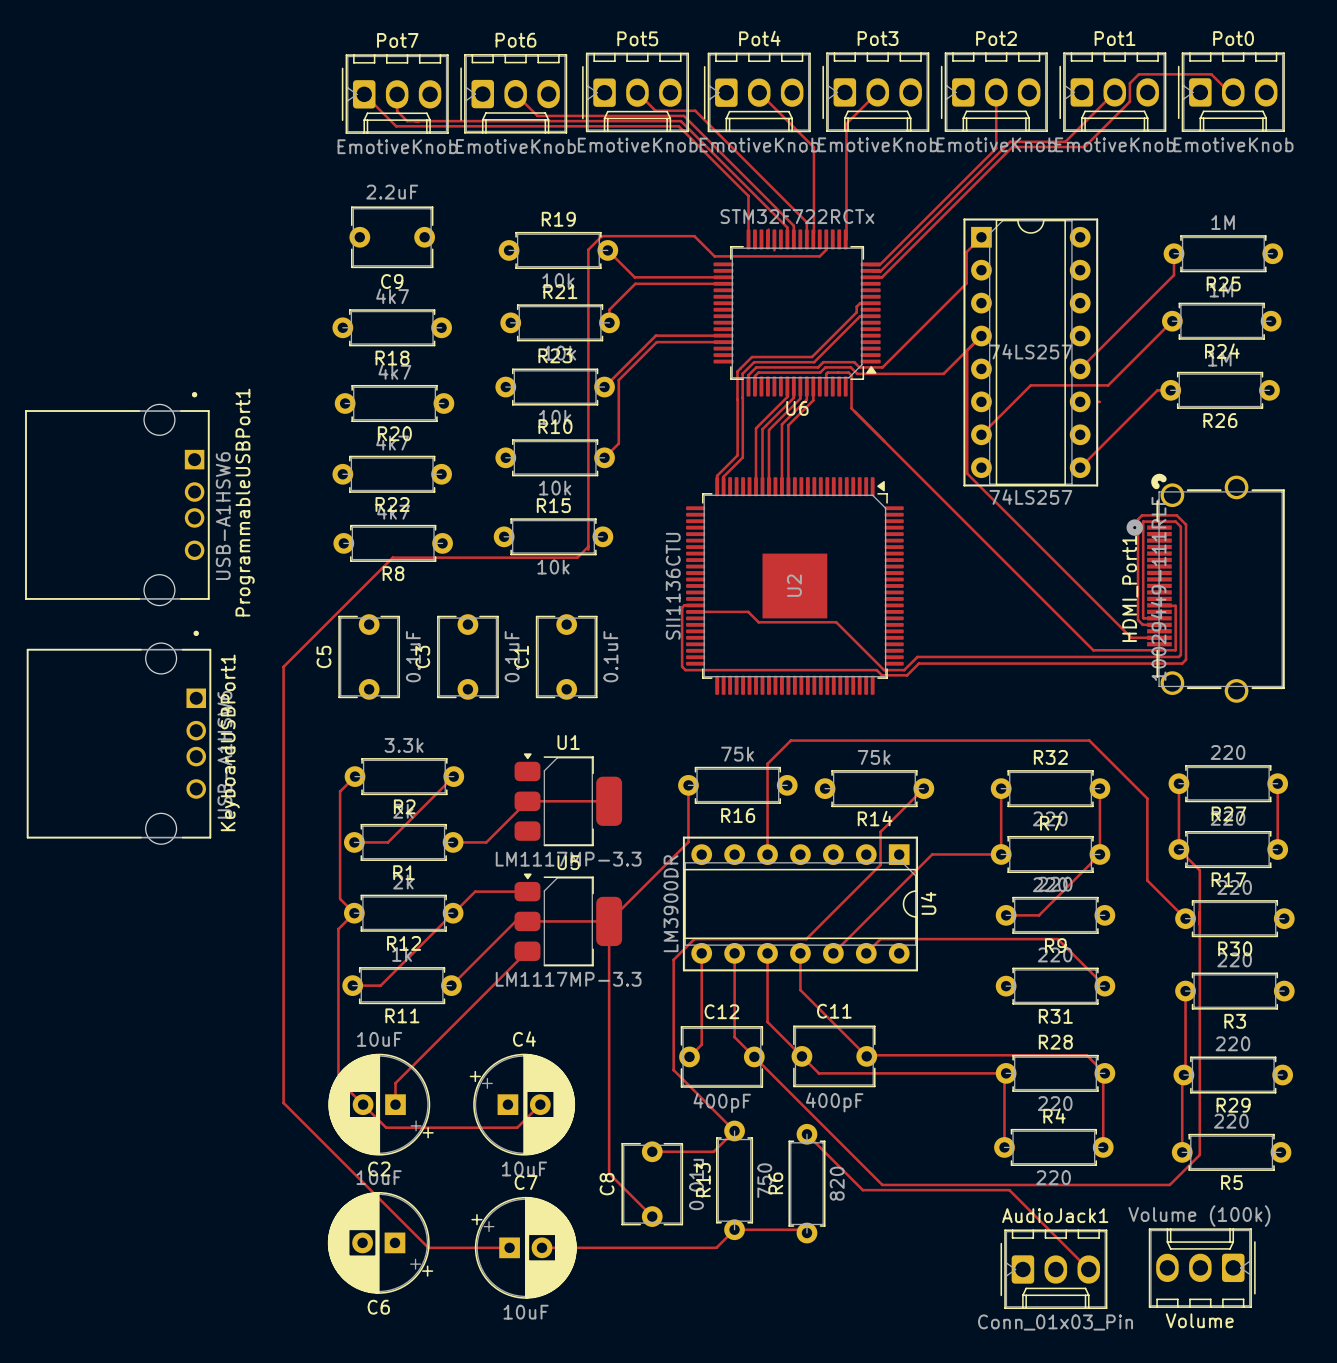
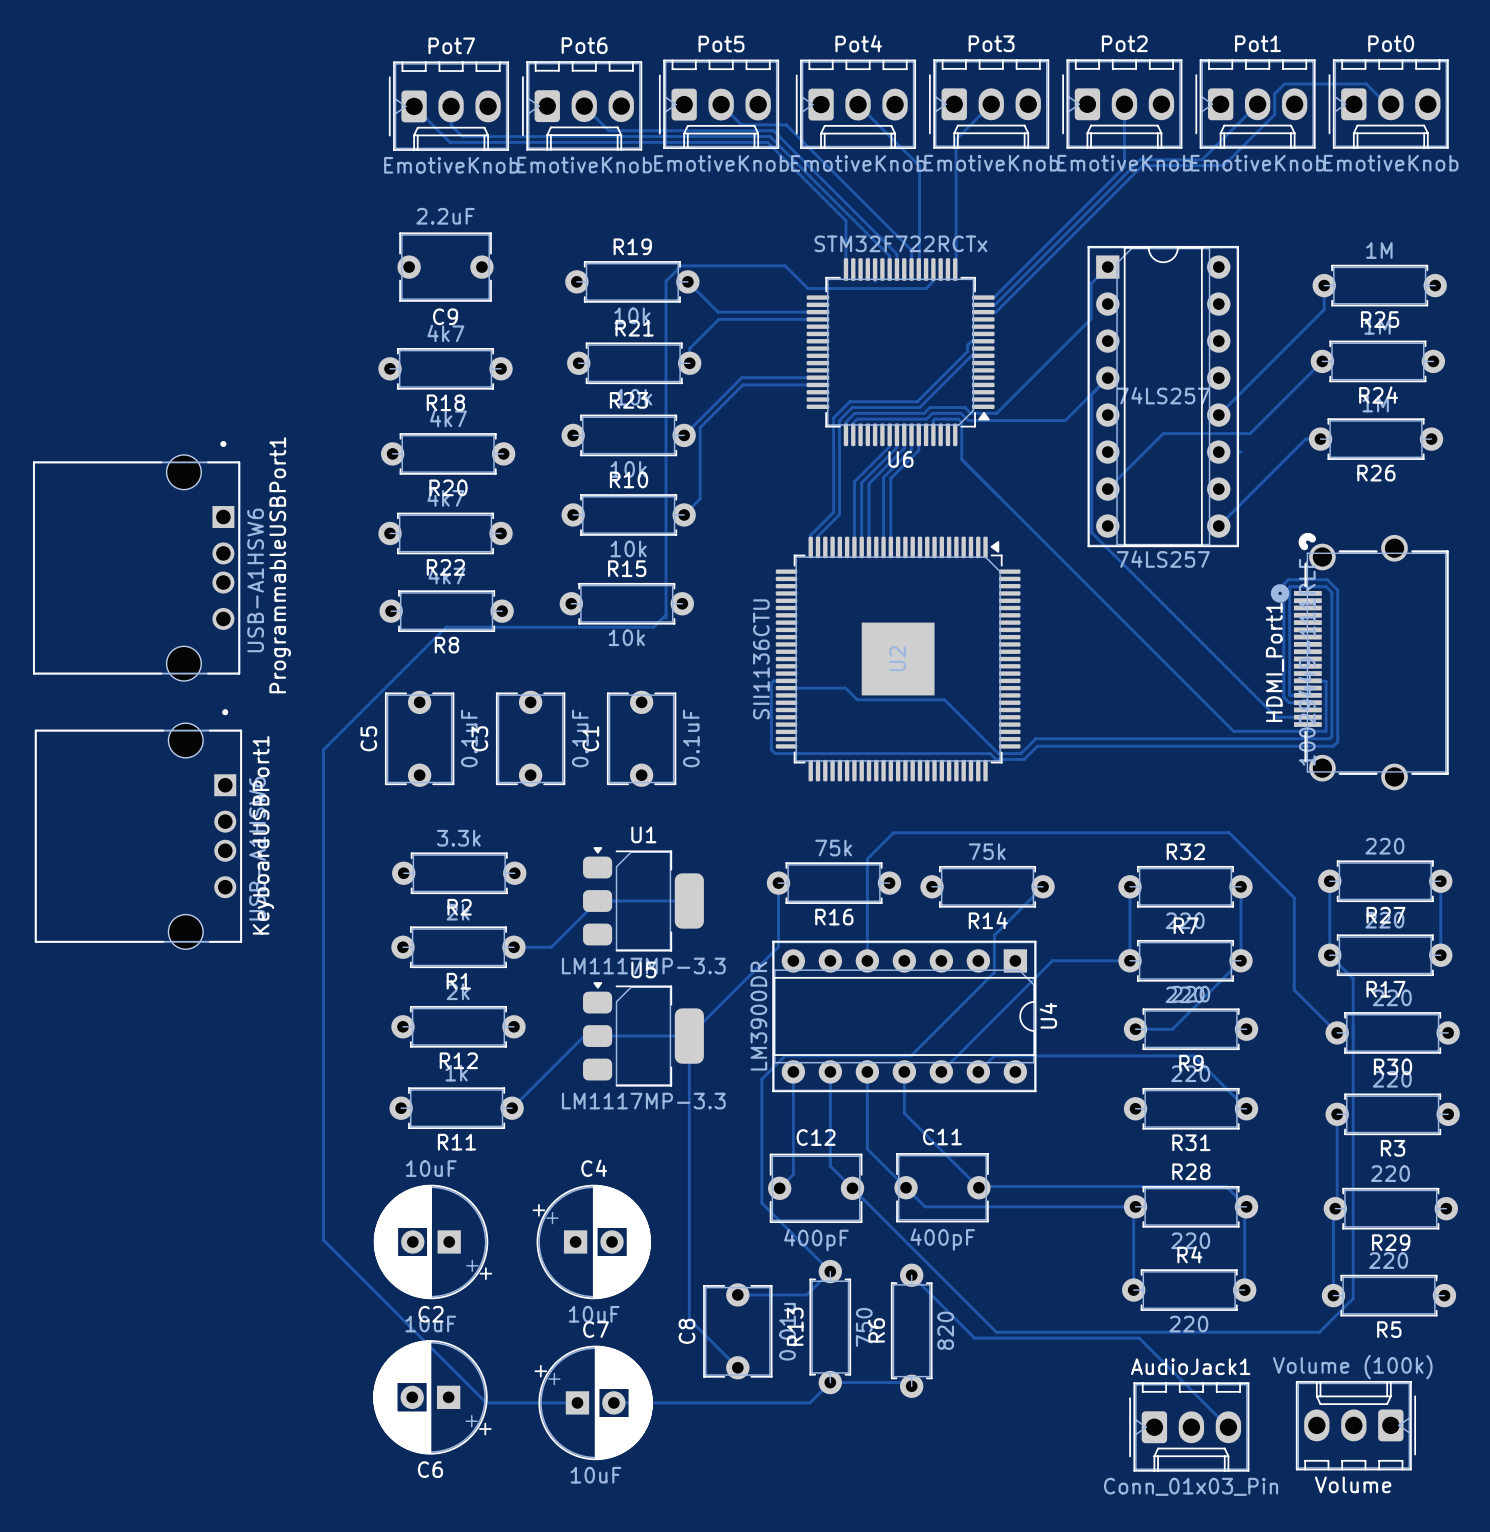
track: (355, 776) (340, 791) (340, 898) (354, 913) (338, 929) (338, 1080) (386, 1127) (517, 1127) (540, 1104) -> none
track: (453, 776) (387, 842) (354, 842) -> none
track: (527, 891) (475, 891) (380, 985) (352, 985) -> none
track: (527, 951) (395, 1083) (395, 1104) -> none

